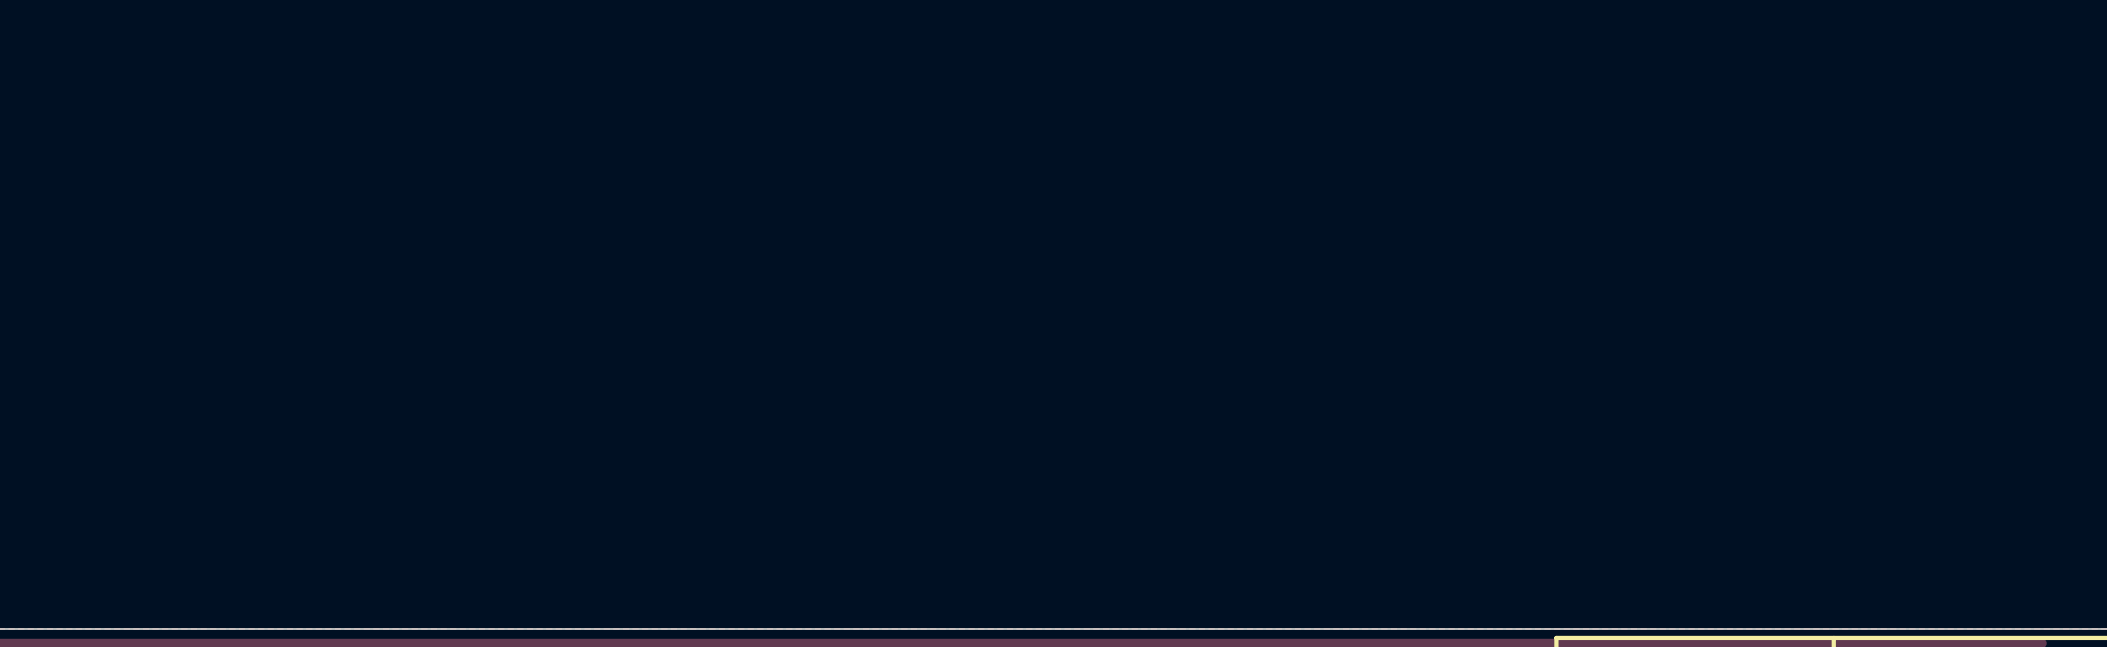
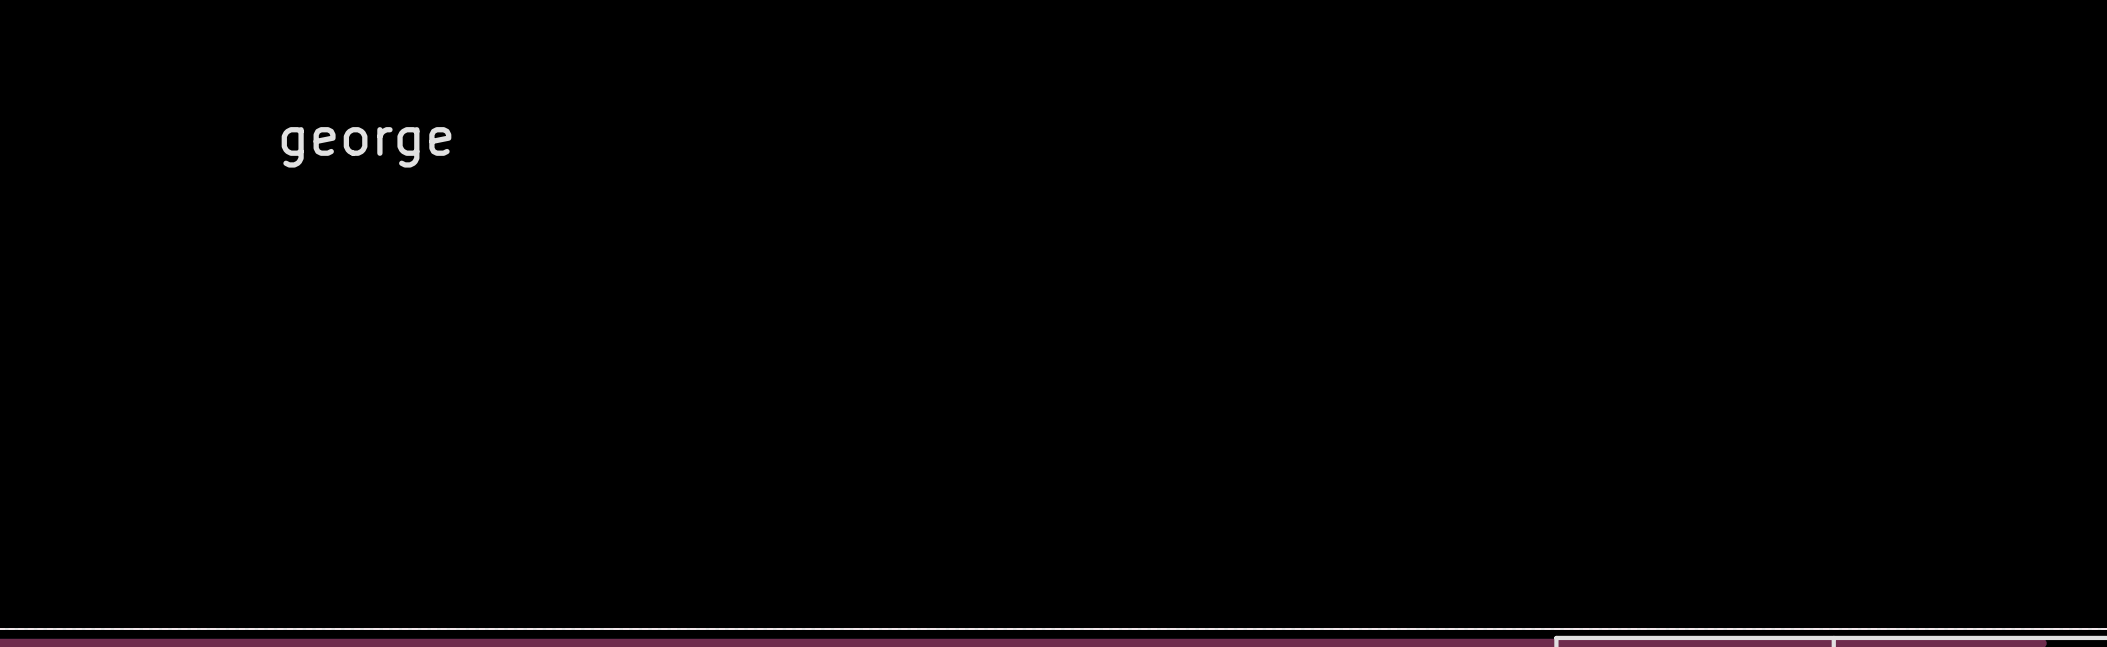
text: none -> george (366, 147)

